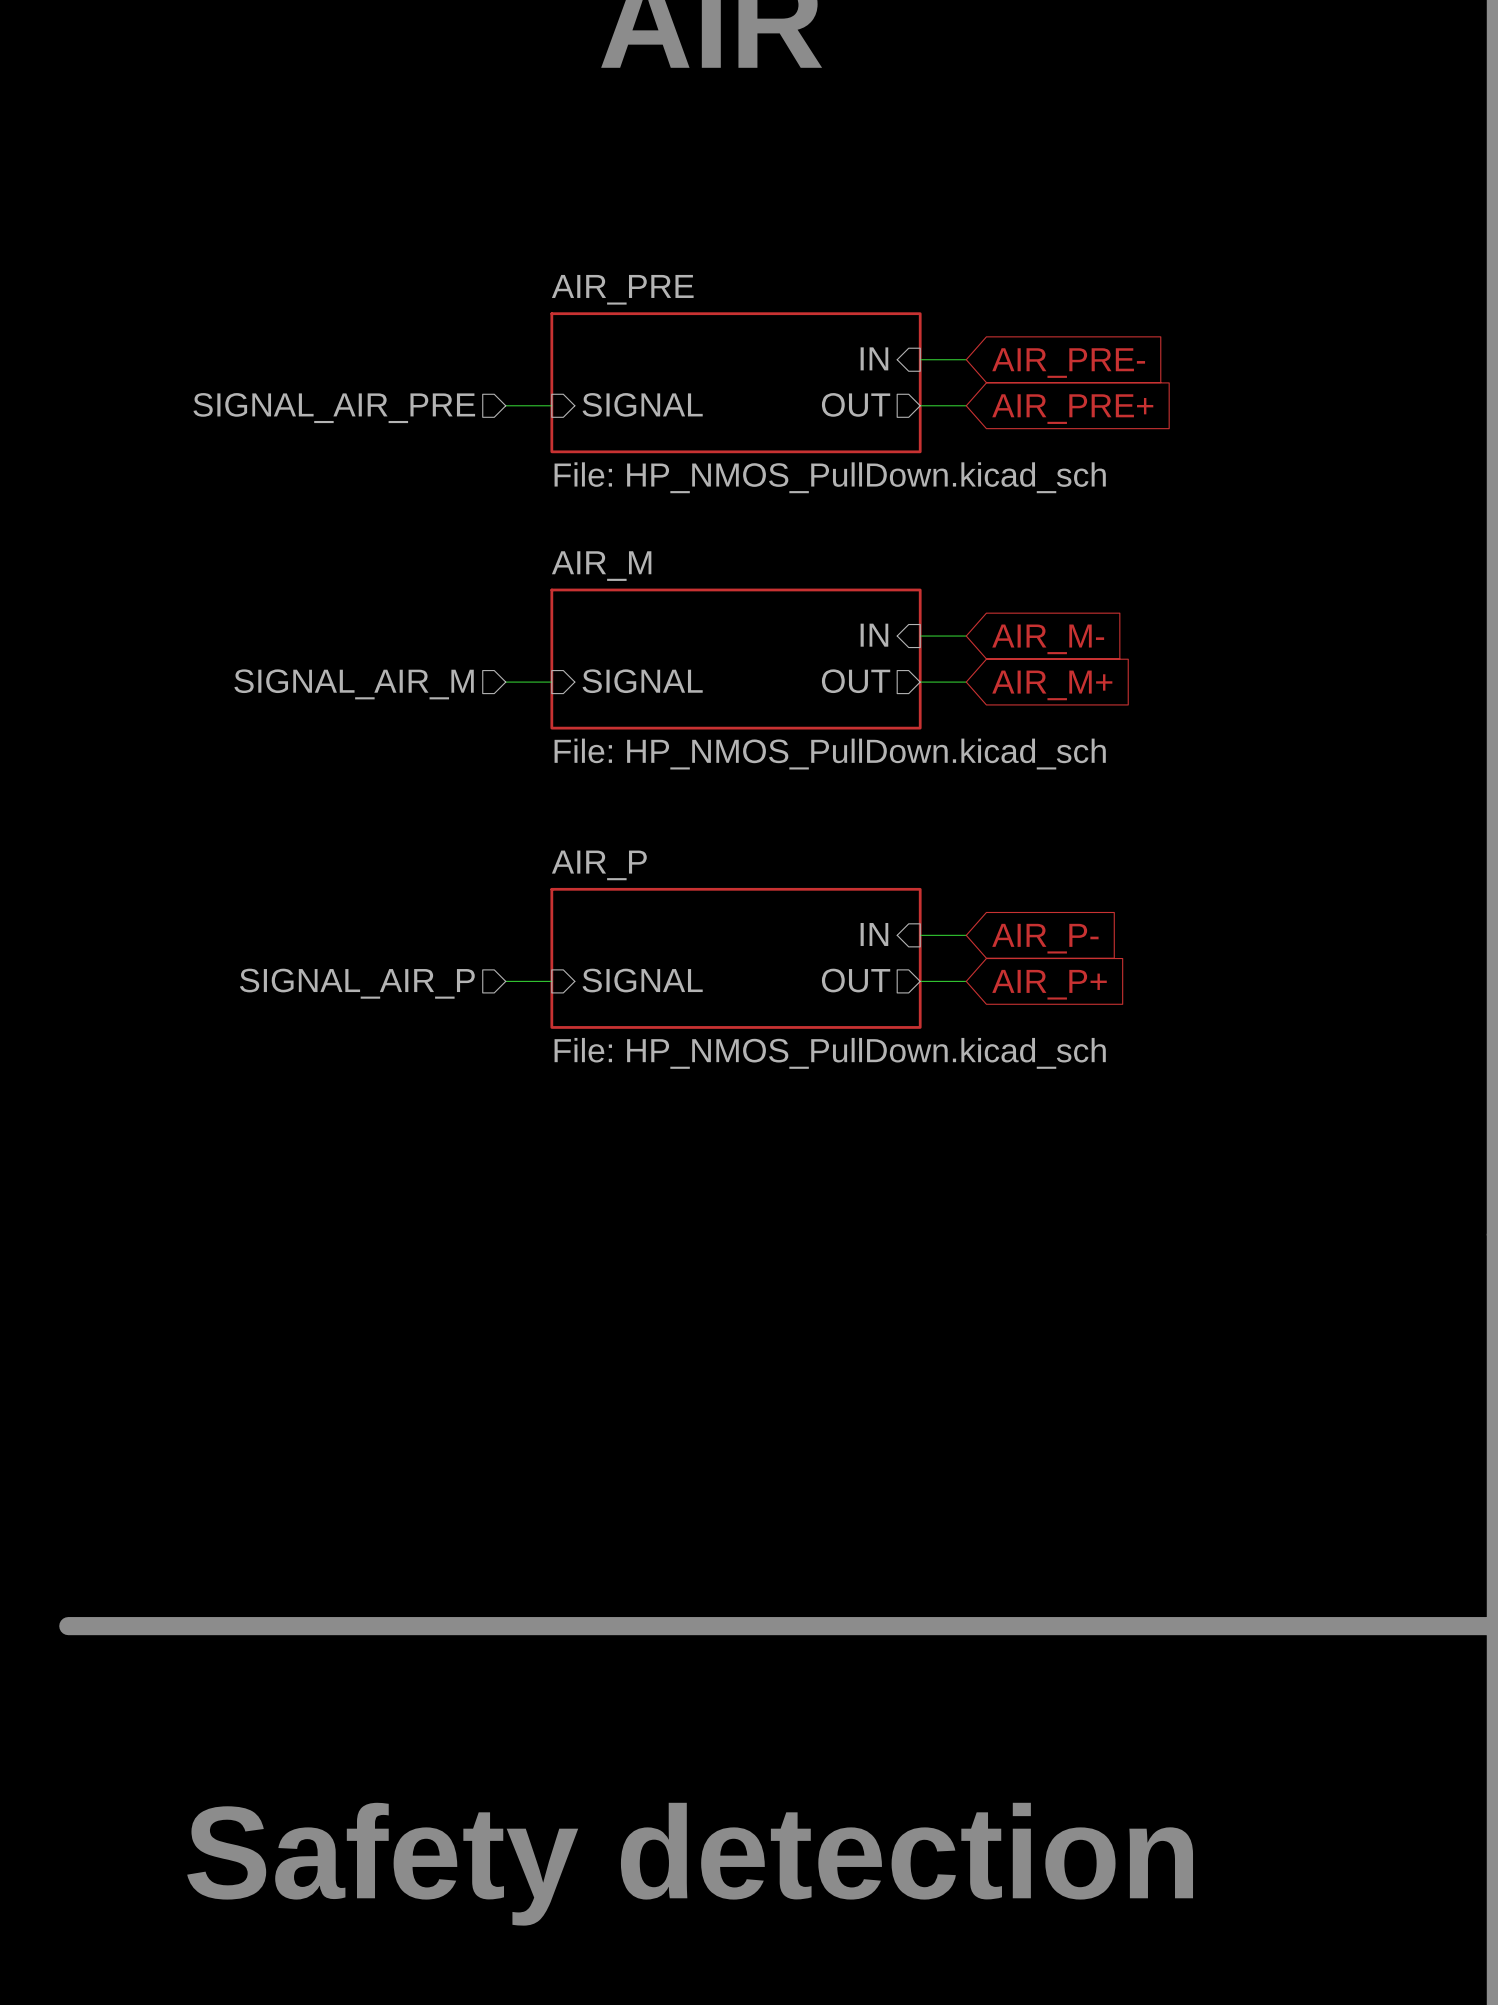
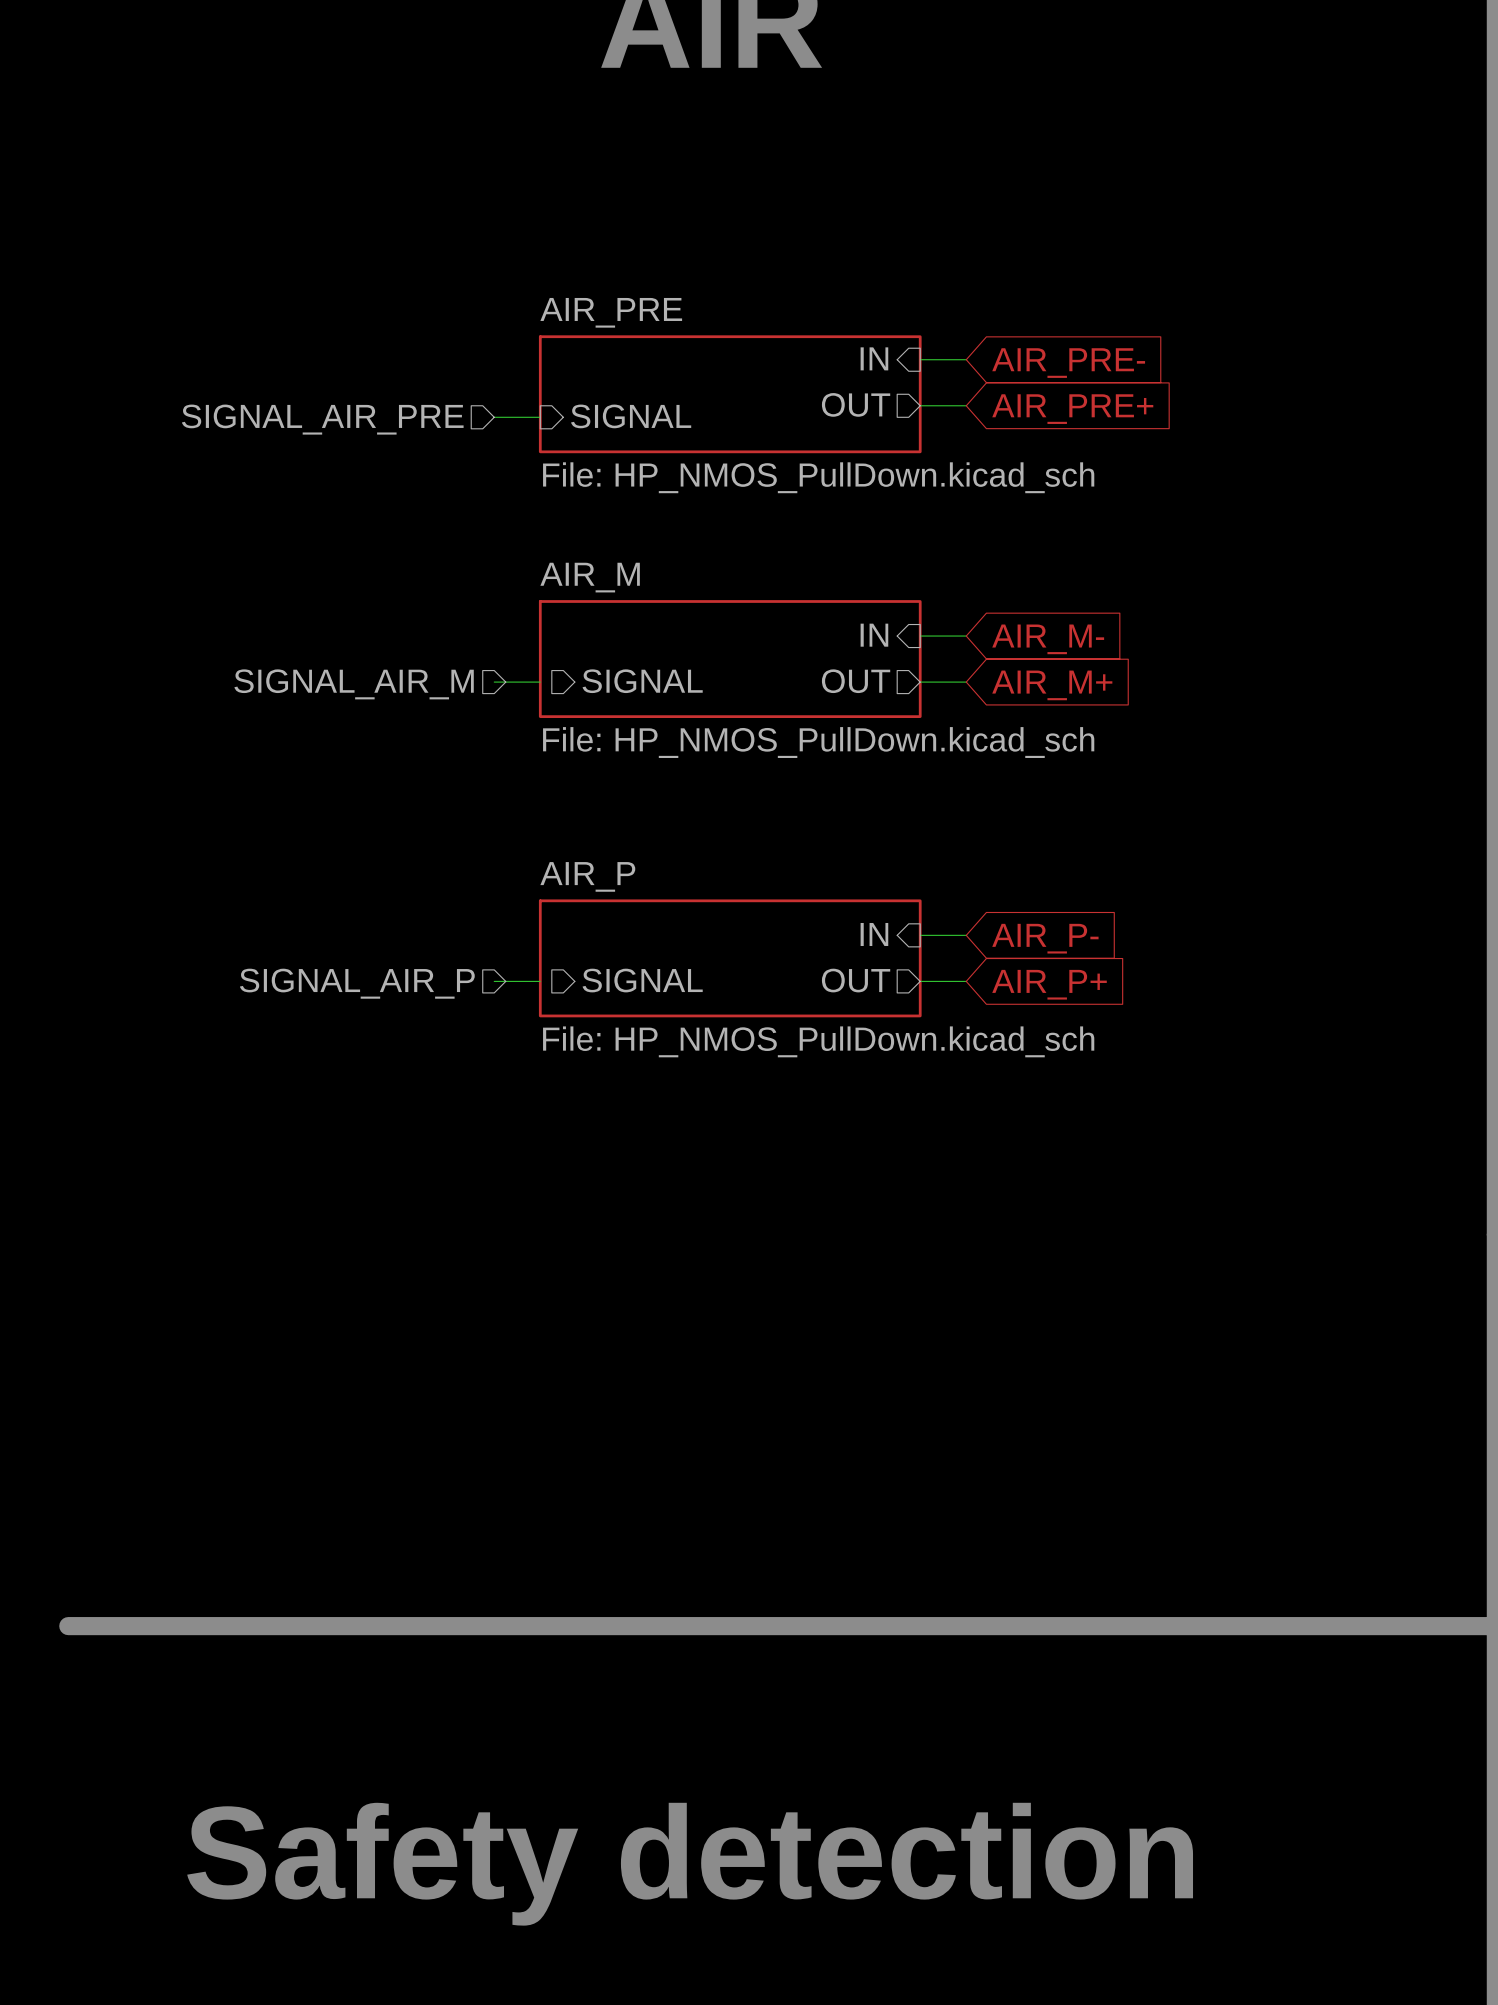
sheet AIR_PRE shape: [550, 312, 922, 454] -> [538, 335, 922, 454]
sheet pin position: SIGNAL (642, 404) -> SIGNAL (631, 416)
wire: (505, 405) (551, 405) -> (494, 417) (540, 417)
hierarchical label position: SIGNAL_AIR_PRE (334, 408) -> SIGNAL_AIR_PRE (322, 419)
sheet AIR_M name position: AIR_M (601, 566) -> AIR_M (590, 577)
sheet AIR_M shape: [550, 588, 922, 730] -> [538, 600, 922, 719]
wire: (540, 682) (551, 682) -> (494, 682) (505, 682)
sheet AIR_M value position: File: HP_NMOS_PullDown.kicad_sch (830, 754) -> File: HP_NMOS_PullDown.kicad_sch (818, 742)
sheet AIR_P name position: AIR_P (599, 865) -> AIR_P (587, 876)
sheet AIR_P shape: [550, 887, 922, 1029] -> [538, 899, 922, 1018]
wire: (540, 981) (551, 981) -> (494, 981) (505, 981)
sheet AIR_P value position: File: HP_NMOS_PullDown.kicad_sch (830, 1053) -> File: HP_NMOS_PullDown.kicad_sch (818, 1041)

